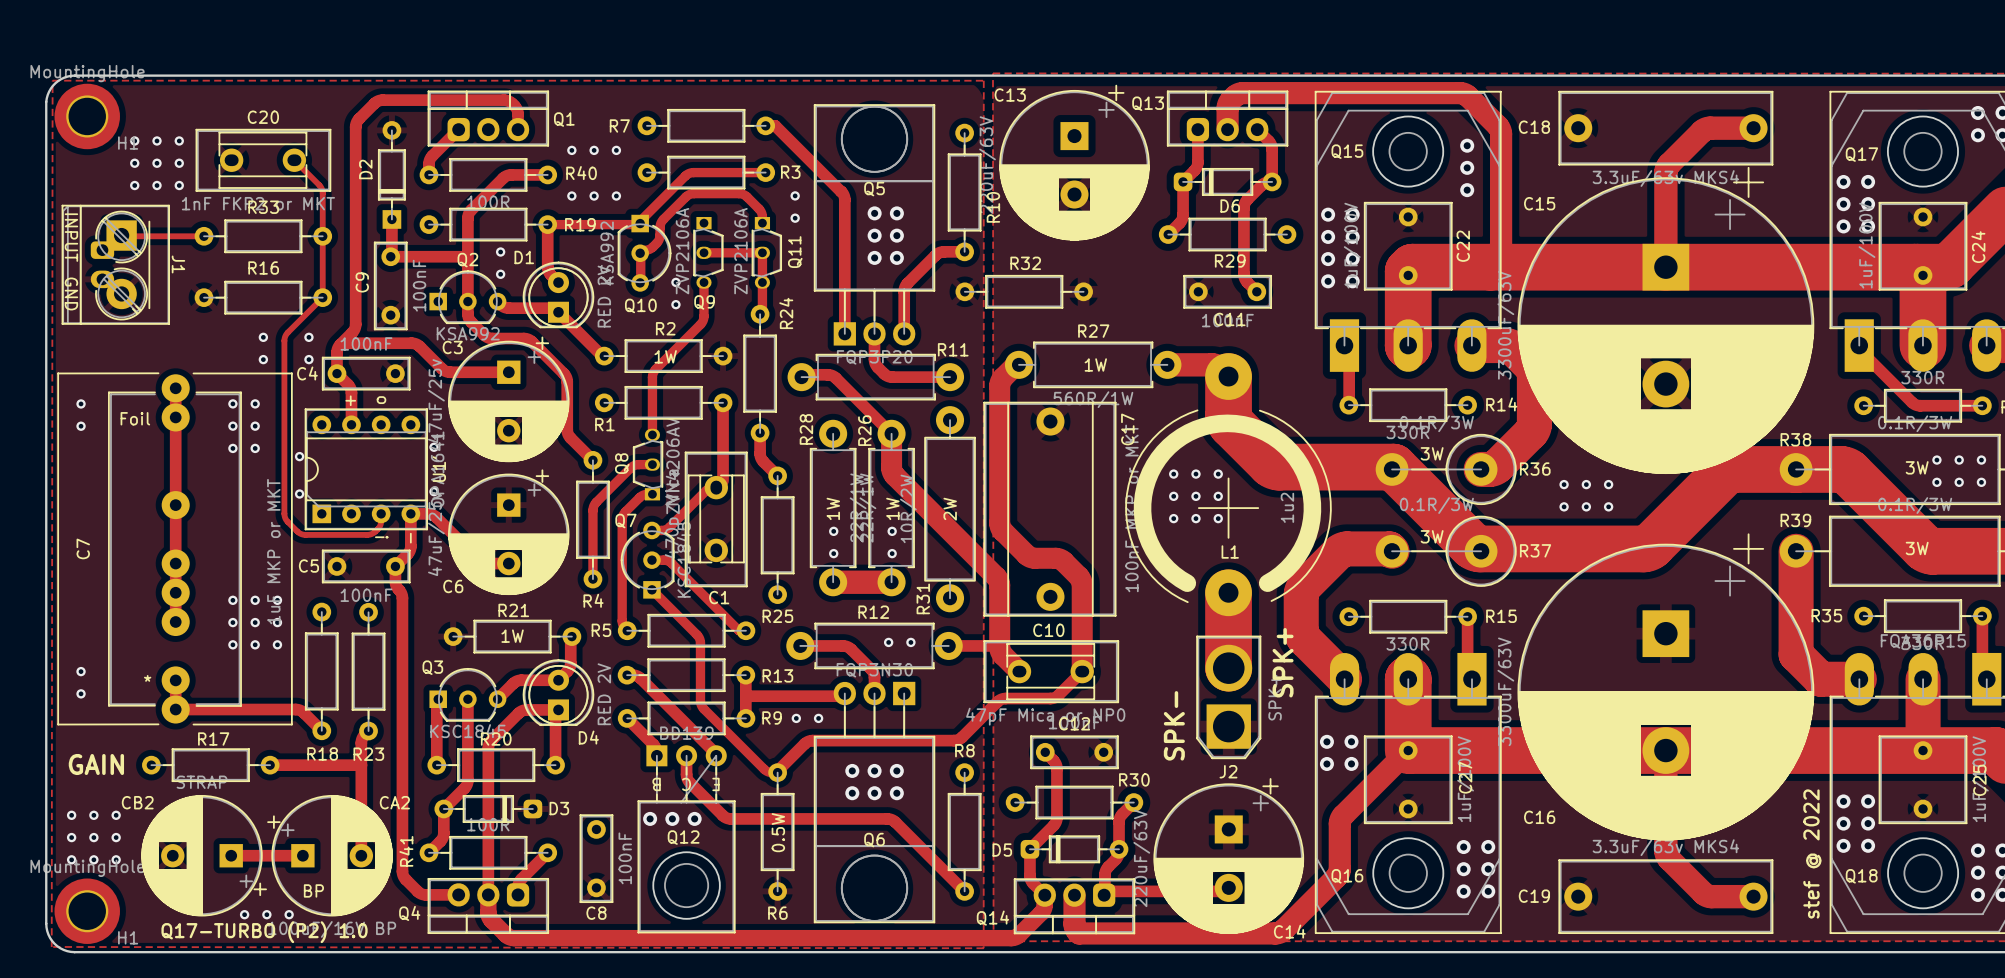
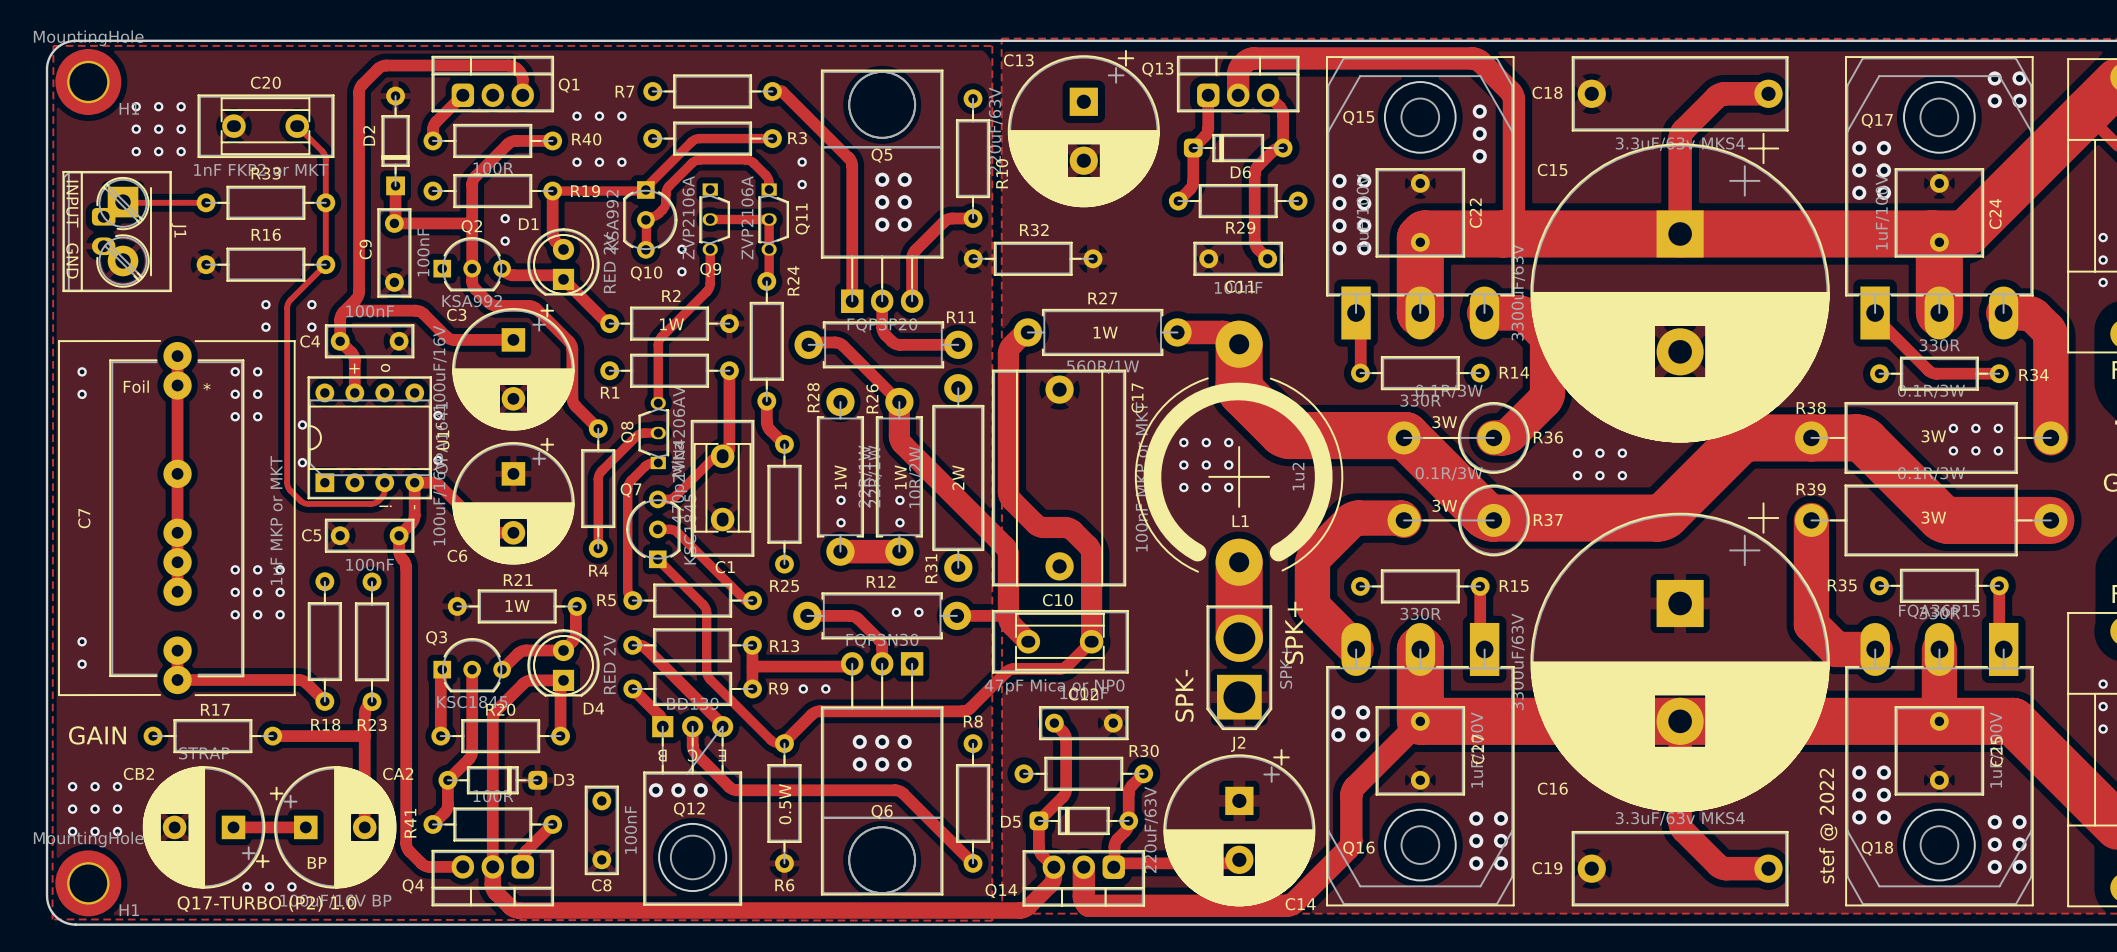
C3 value: 47uF/25v (436, 401) -> 100uF/16V (439, 368)
C6 value: 47uF/25v (436, 534) -> 100uF/16V (439, 502)
text position: * (147, 678) -> * (207, 386)

